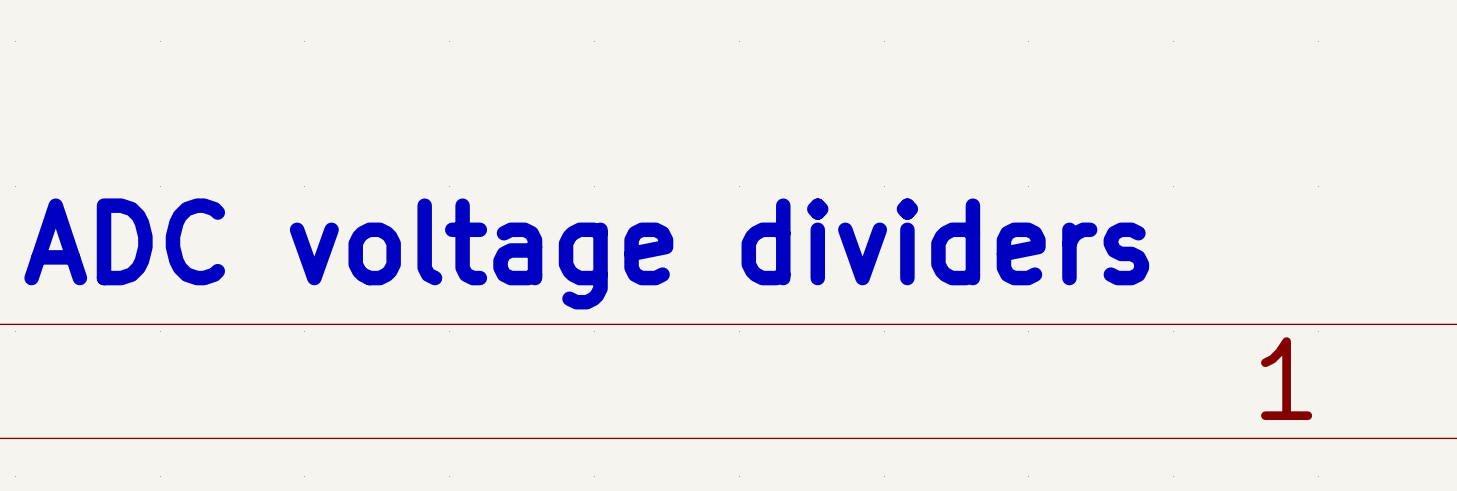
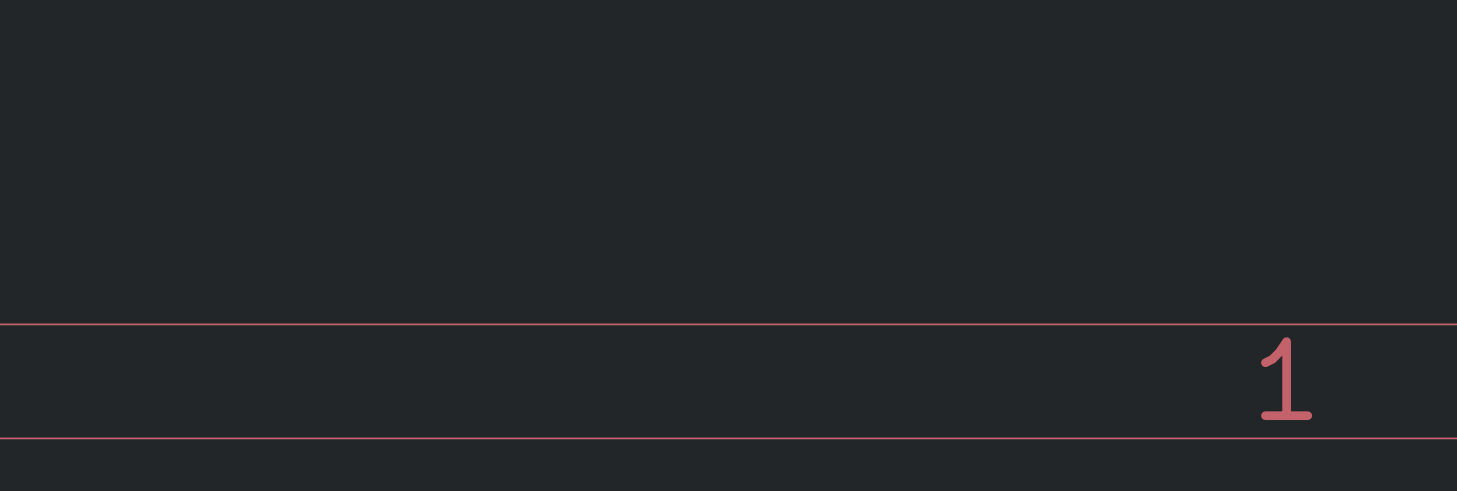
text: ADC voltage dividers (586, 253) -> none

